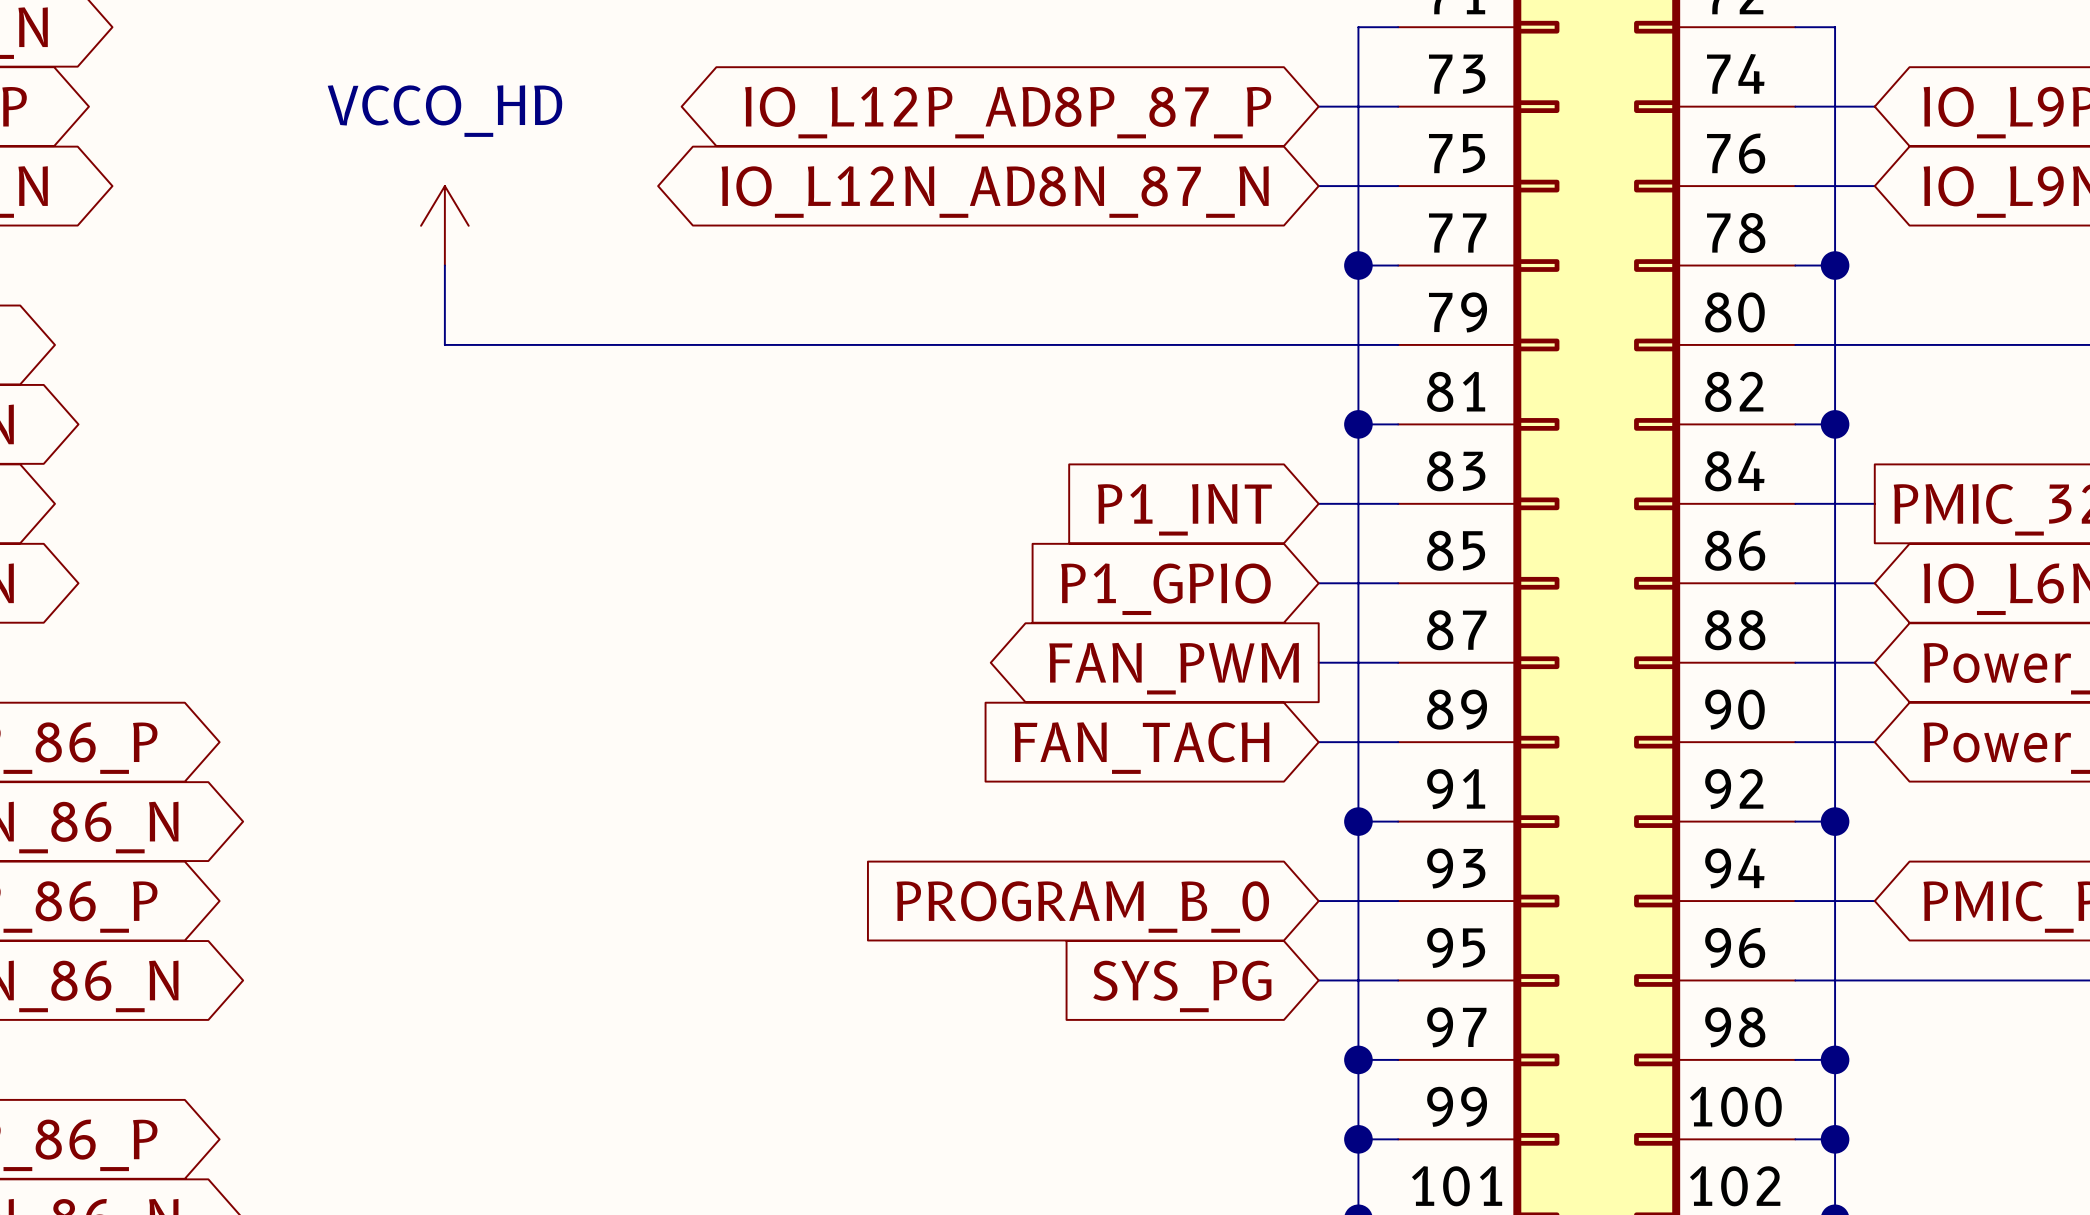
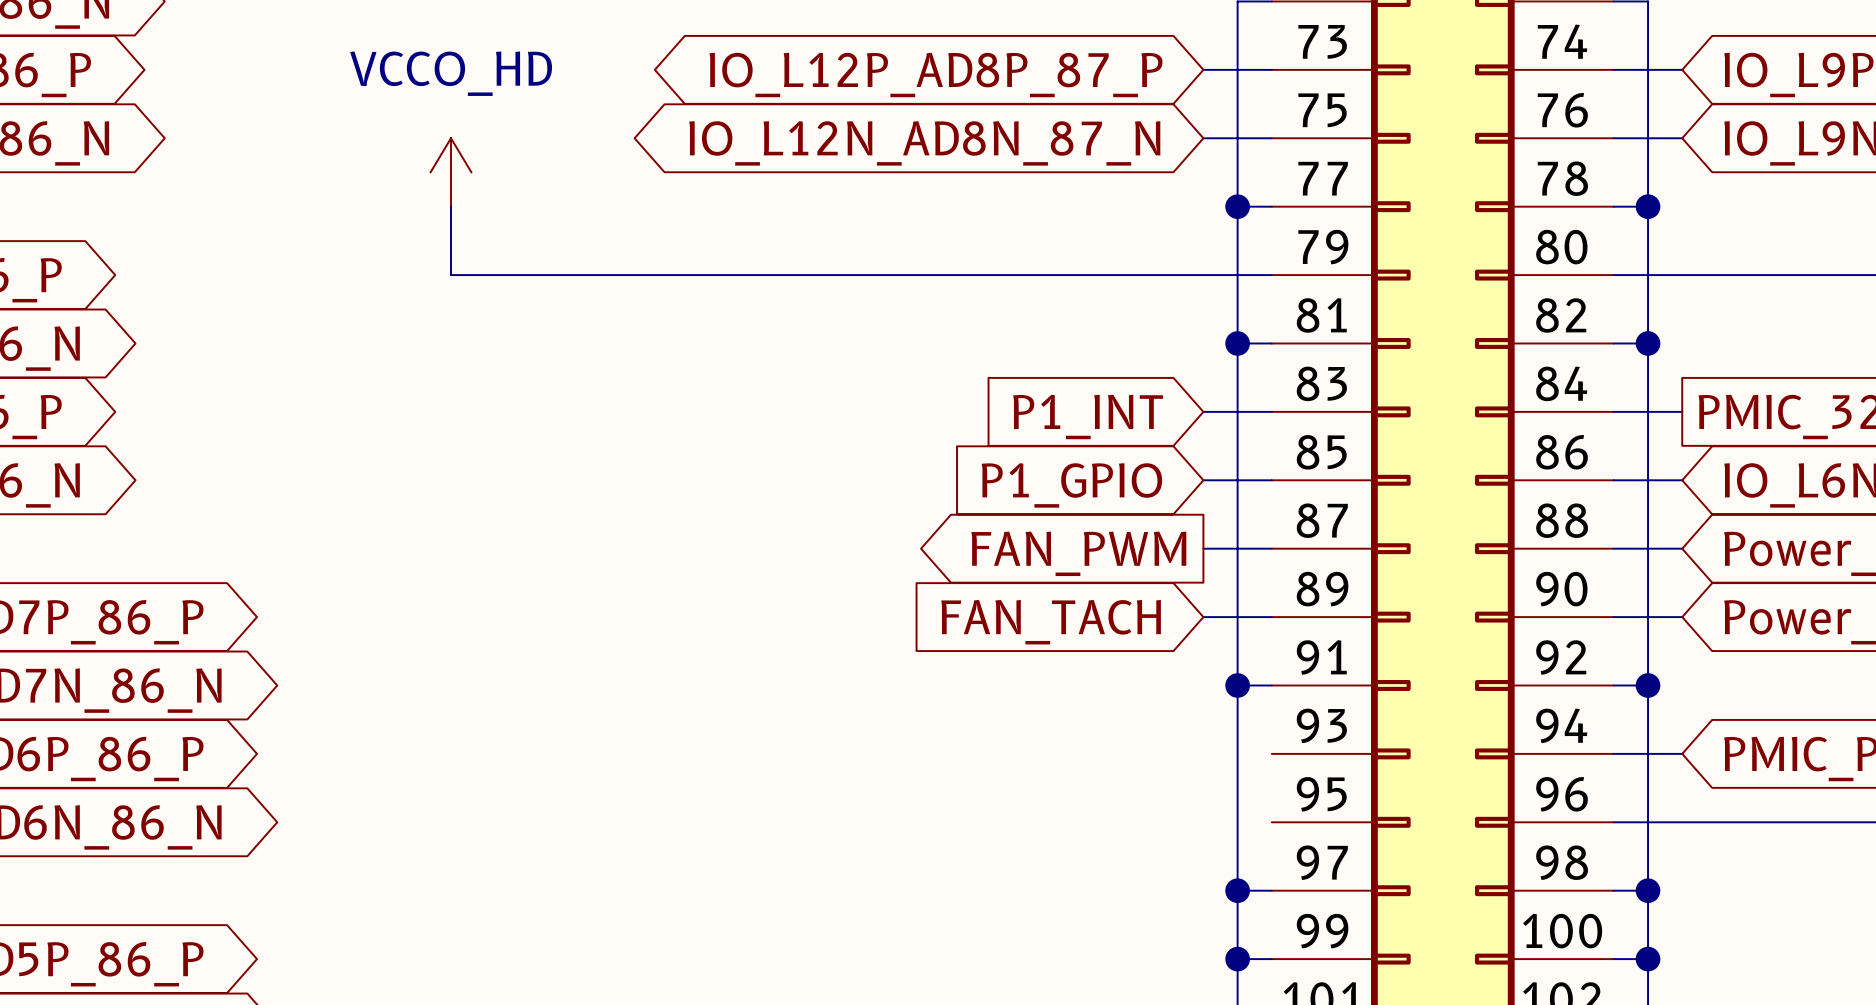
wire: (1318, 901) (1398, 901) -> none
global label: PROGRAM_B_0 (1082, 906) -> none
wire: (1318, 980) (1398, 980) -> none
global label: SYS_PG (1182, 986) -> none

